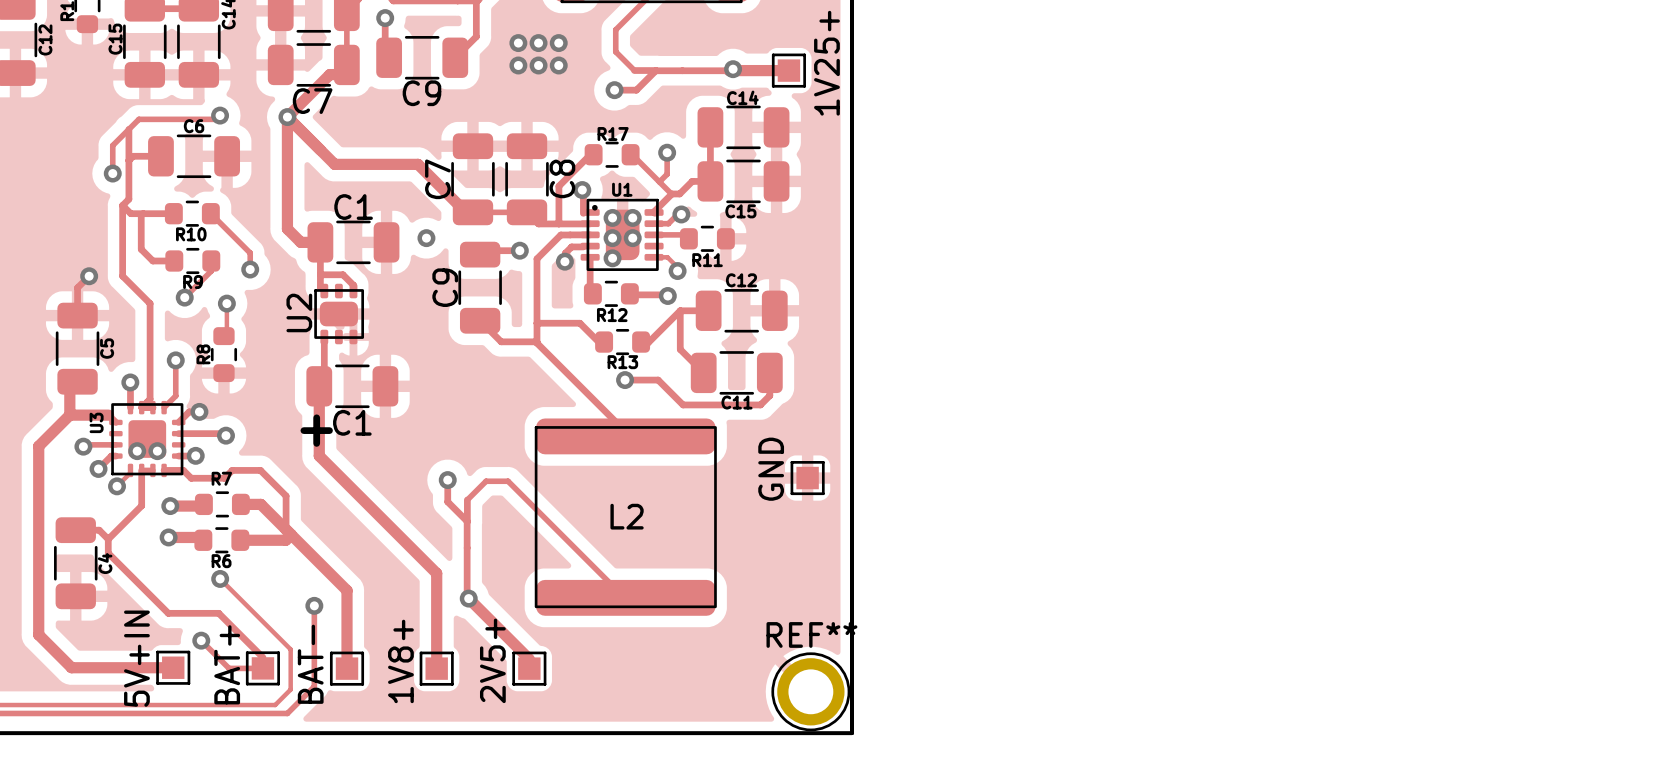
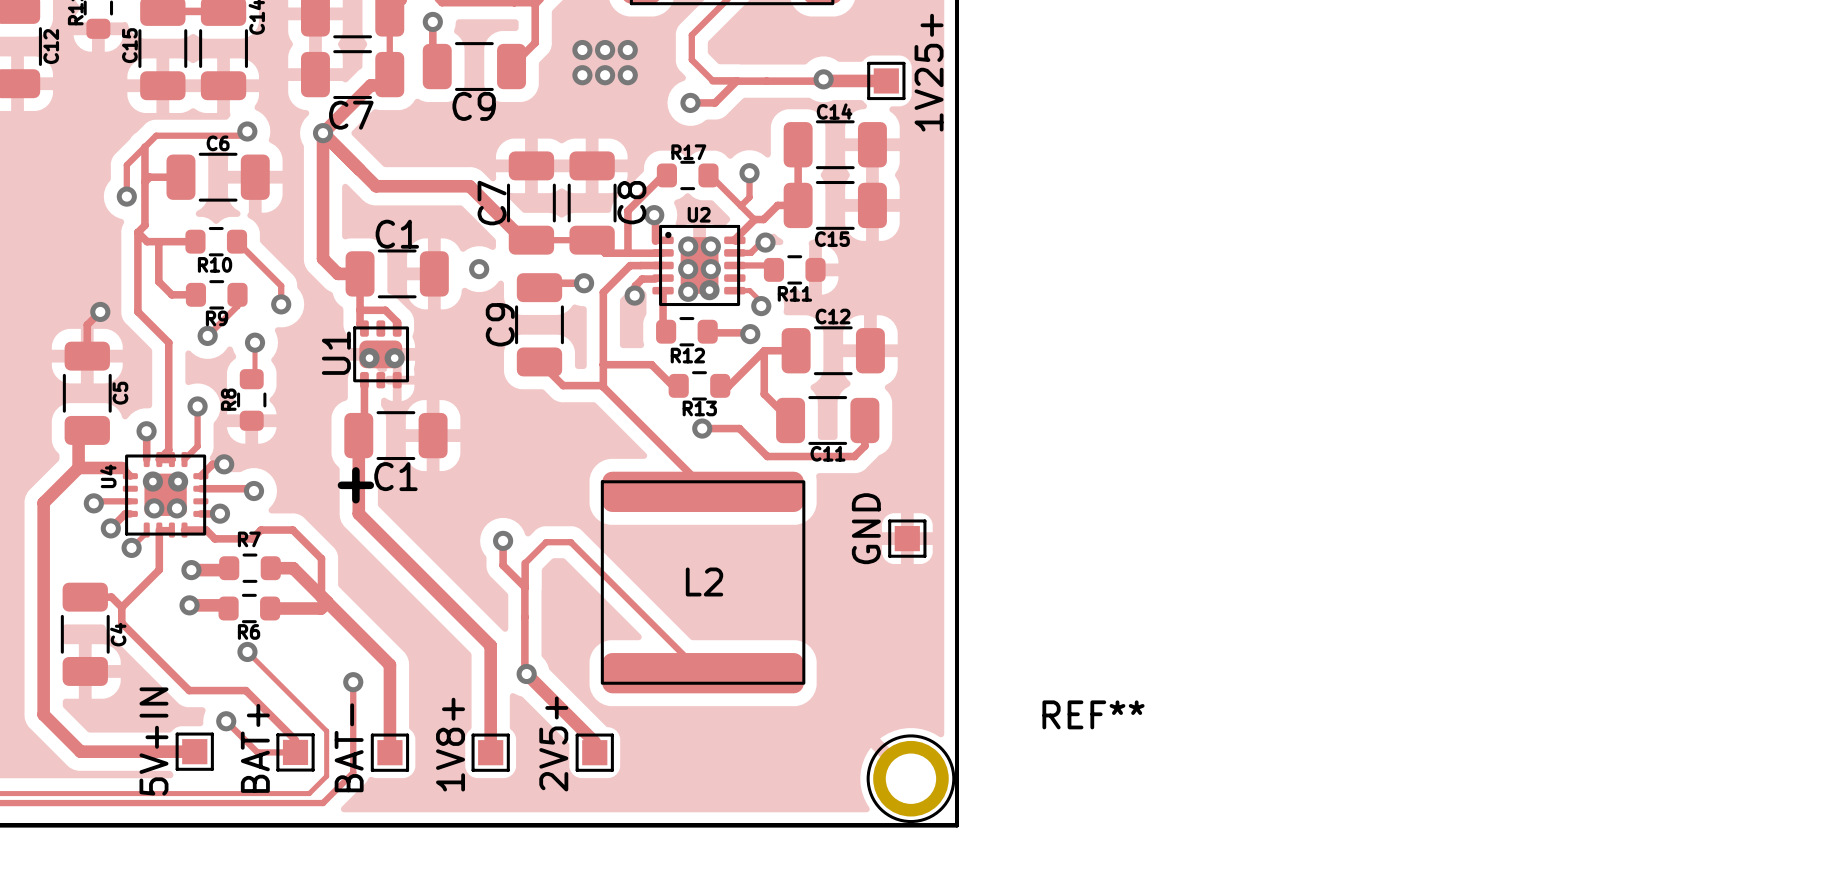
U1 name: U1 (622, 189) -> U2 (699, 214)
via: none -> (709, 290)
U2 name: U2 (299, 312) -> U1 (336, 353)
via: none -> (369, 358)
via: none -> (394, 358)
U3 name: U3 (96, 422) -> U4 (108, 476)
via: none -> (152, 481)
via: none -> (178, 481)
REF** name position: REF** (811, 634) -> REF** (1093, 714)

